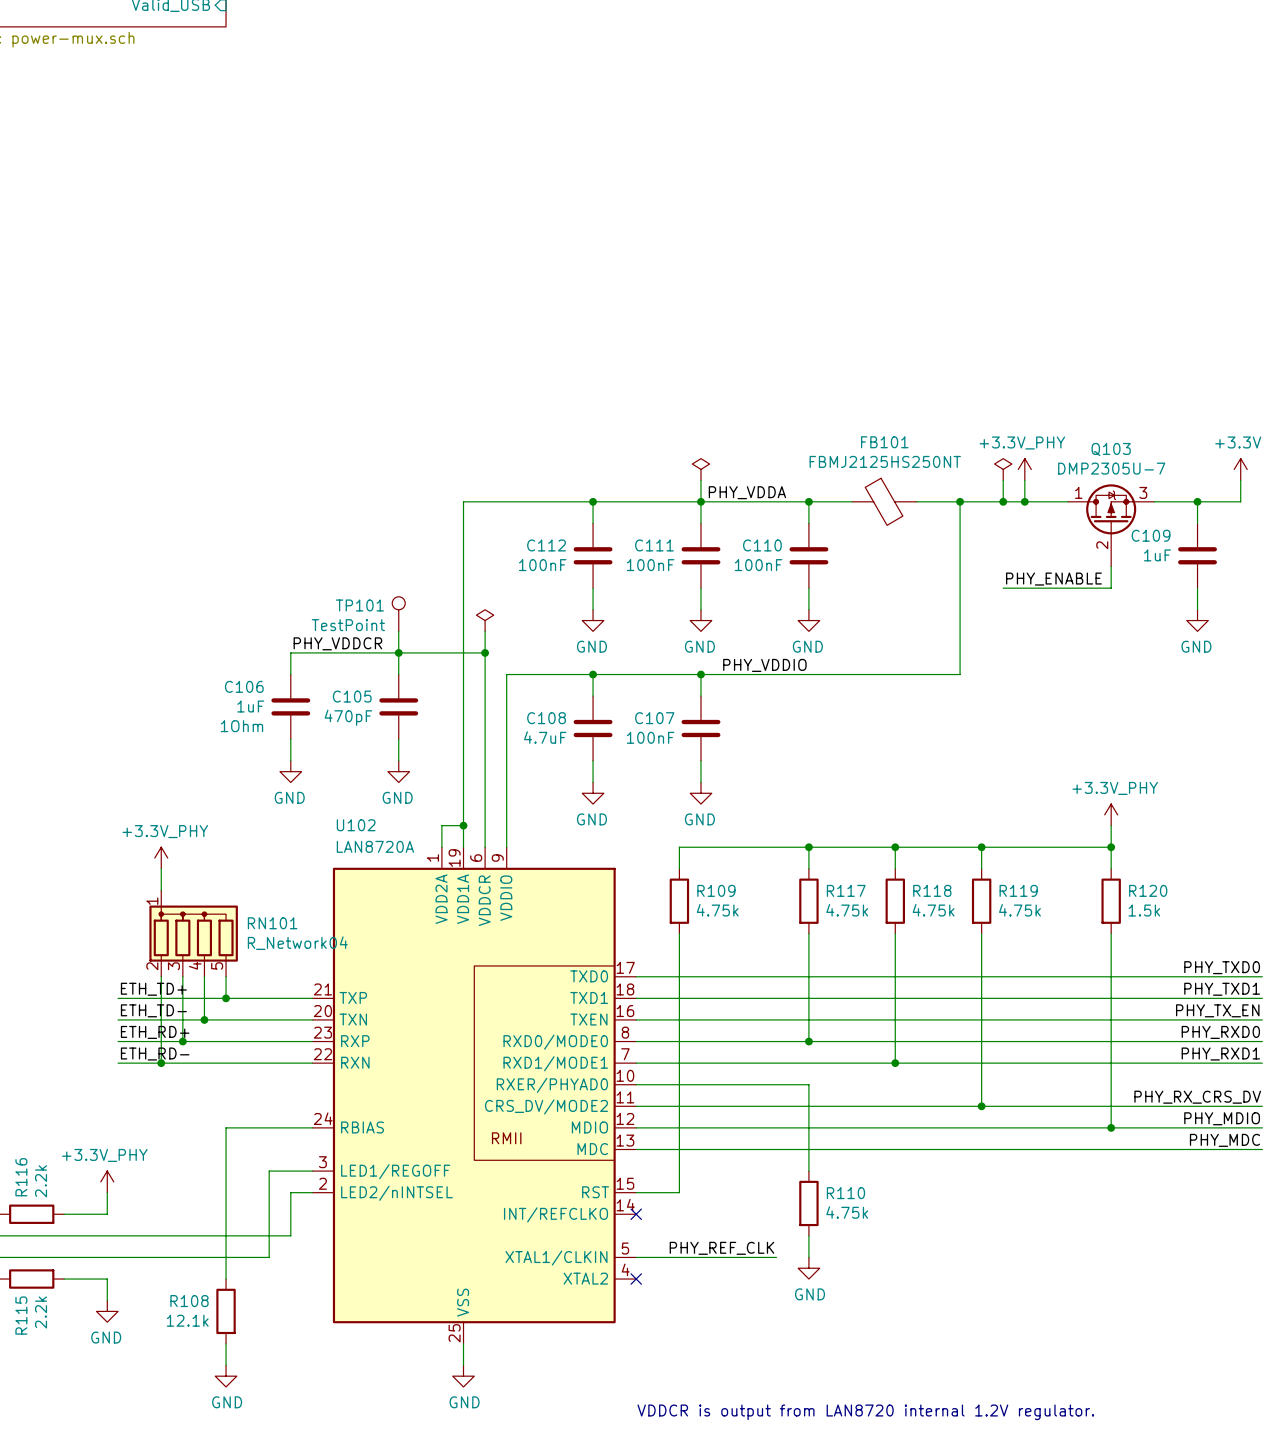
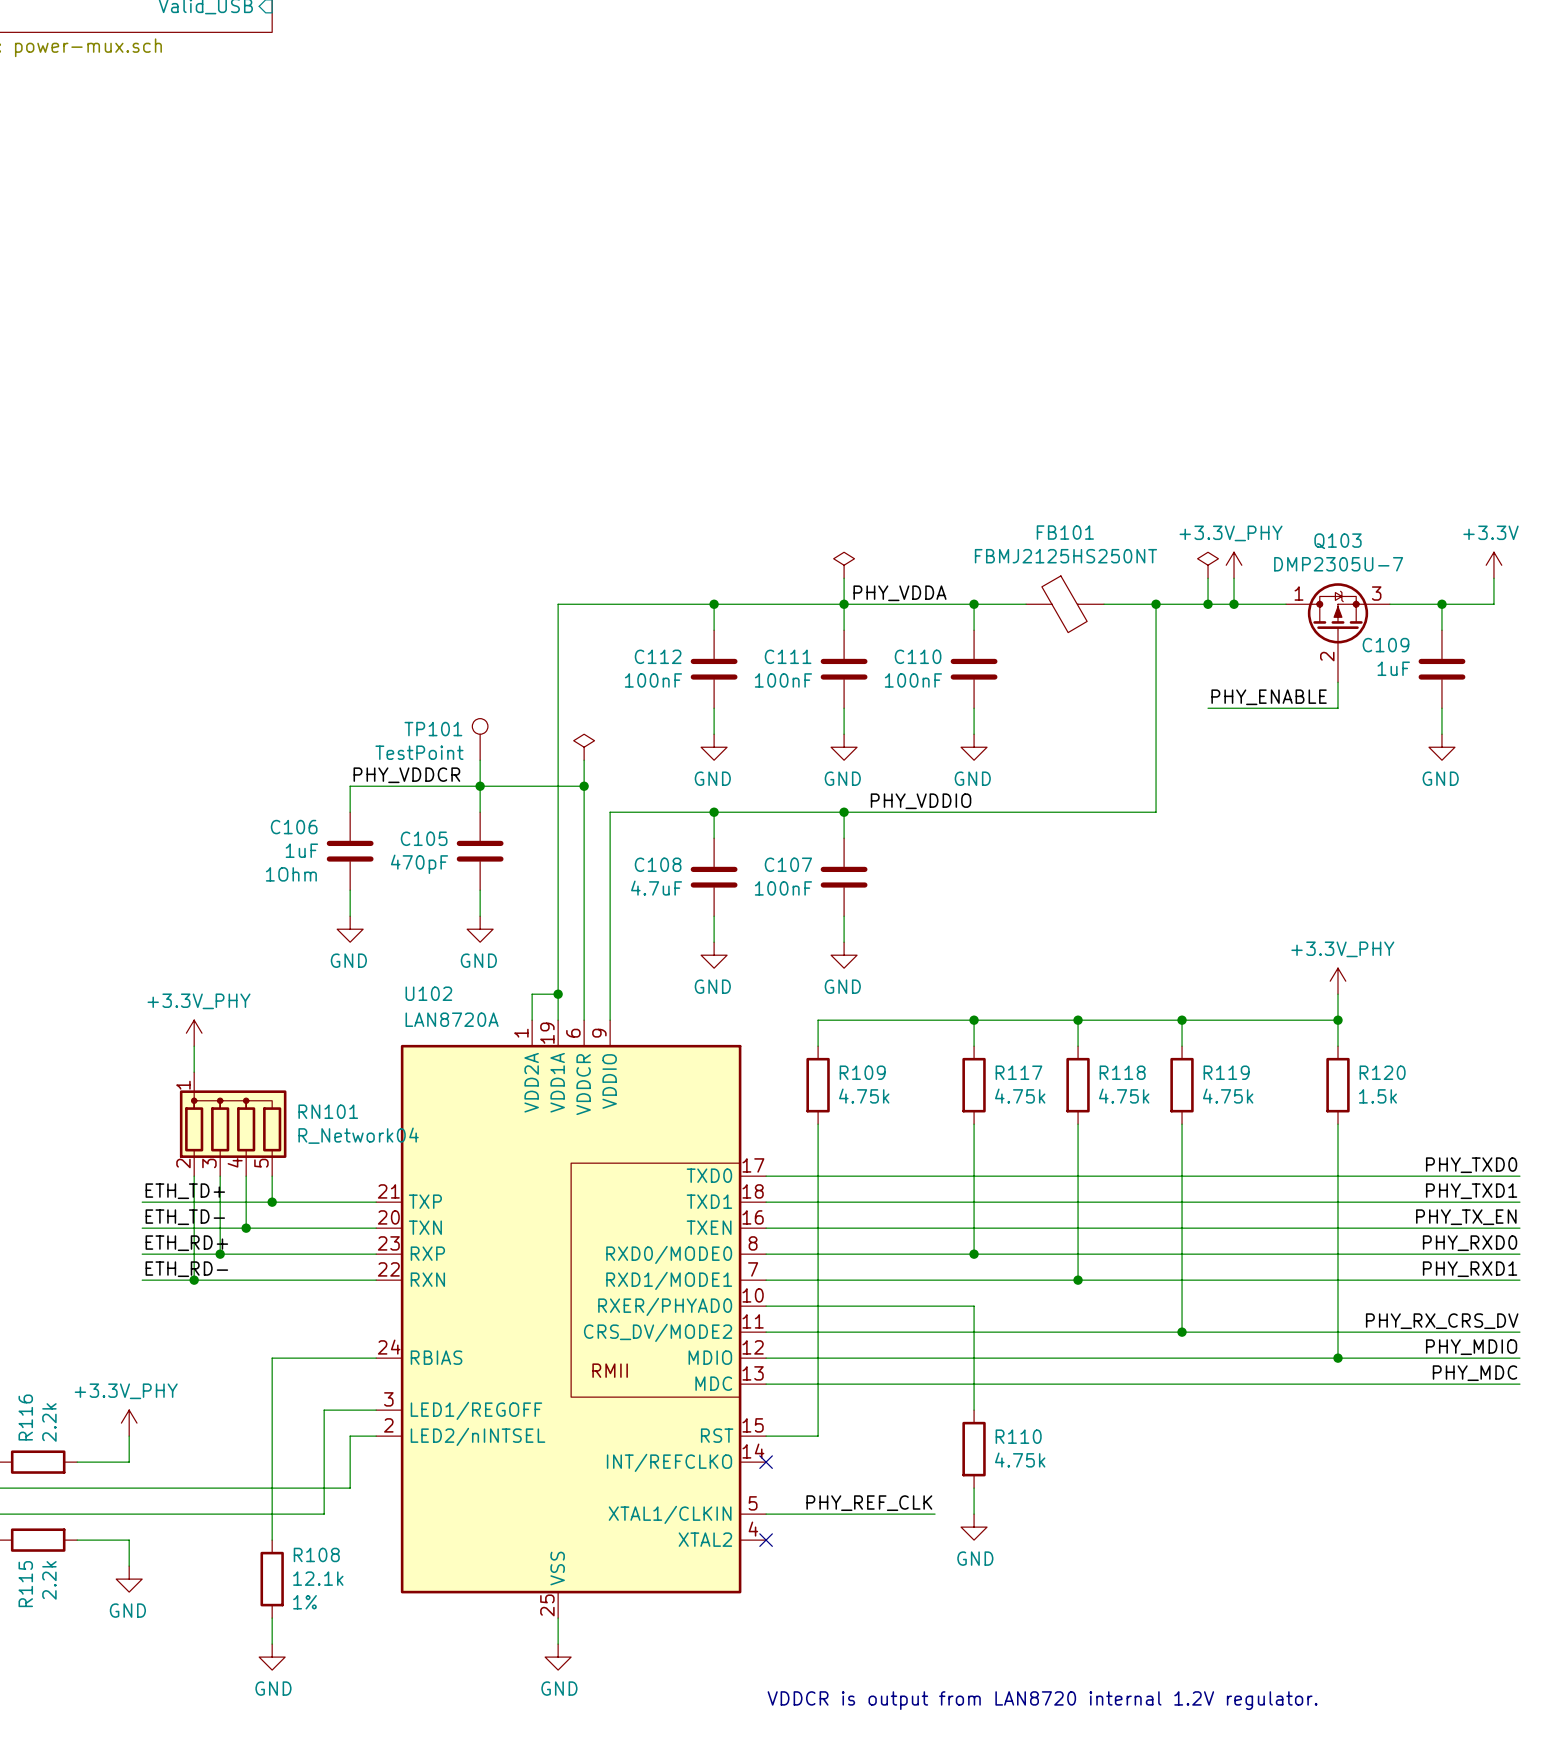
R108 name position: R108 (189, 1301) -> R108 (316, 1554)
R108 value position: 12.1k (187, 1320) -> 12.1k (318, 1578)
R108 text: none -> 1% (305, 1602)

